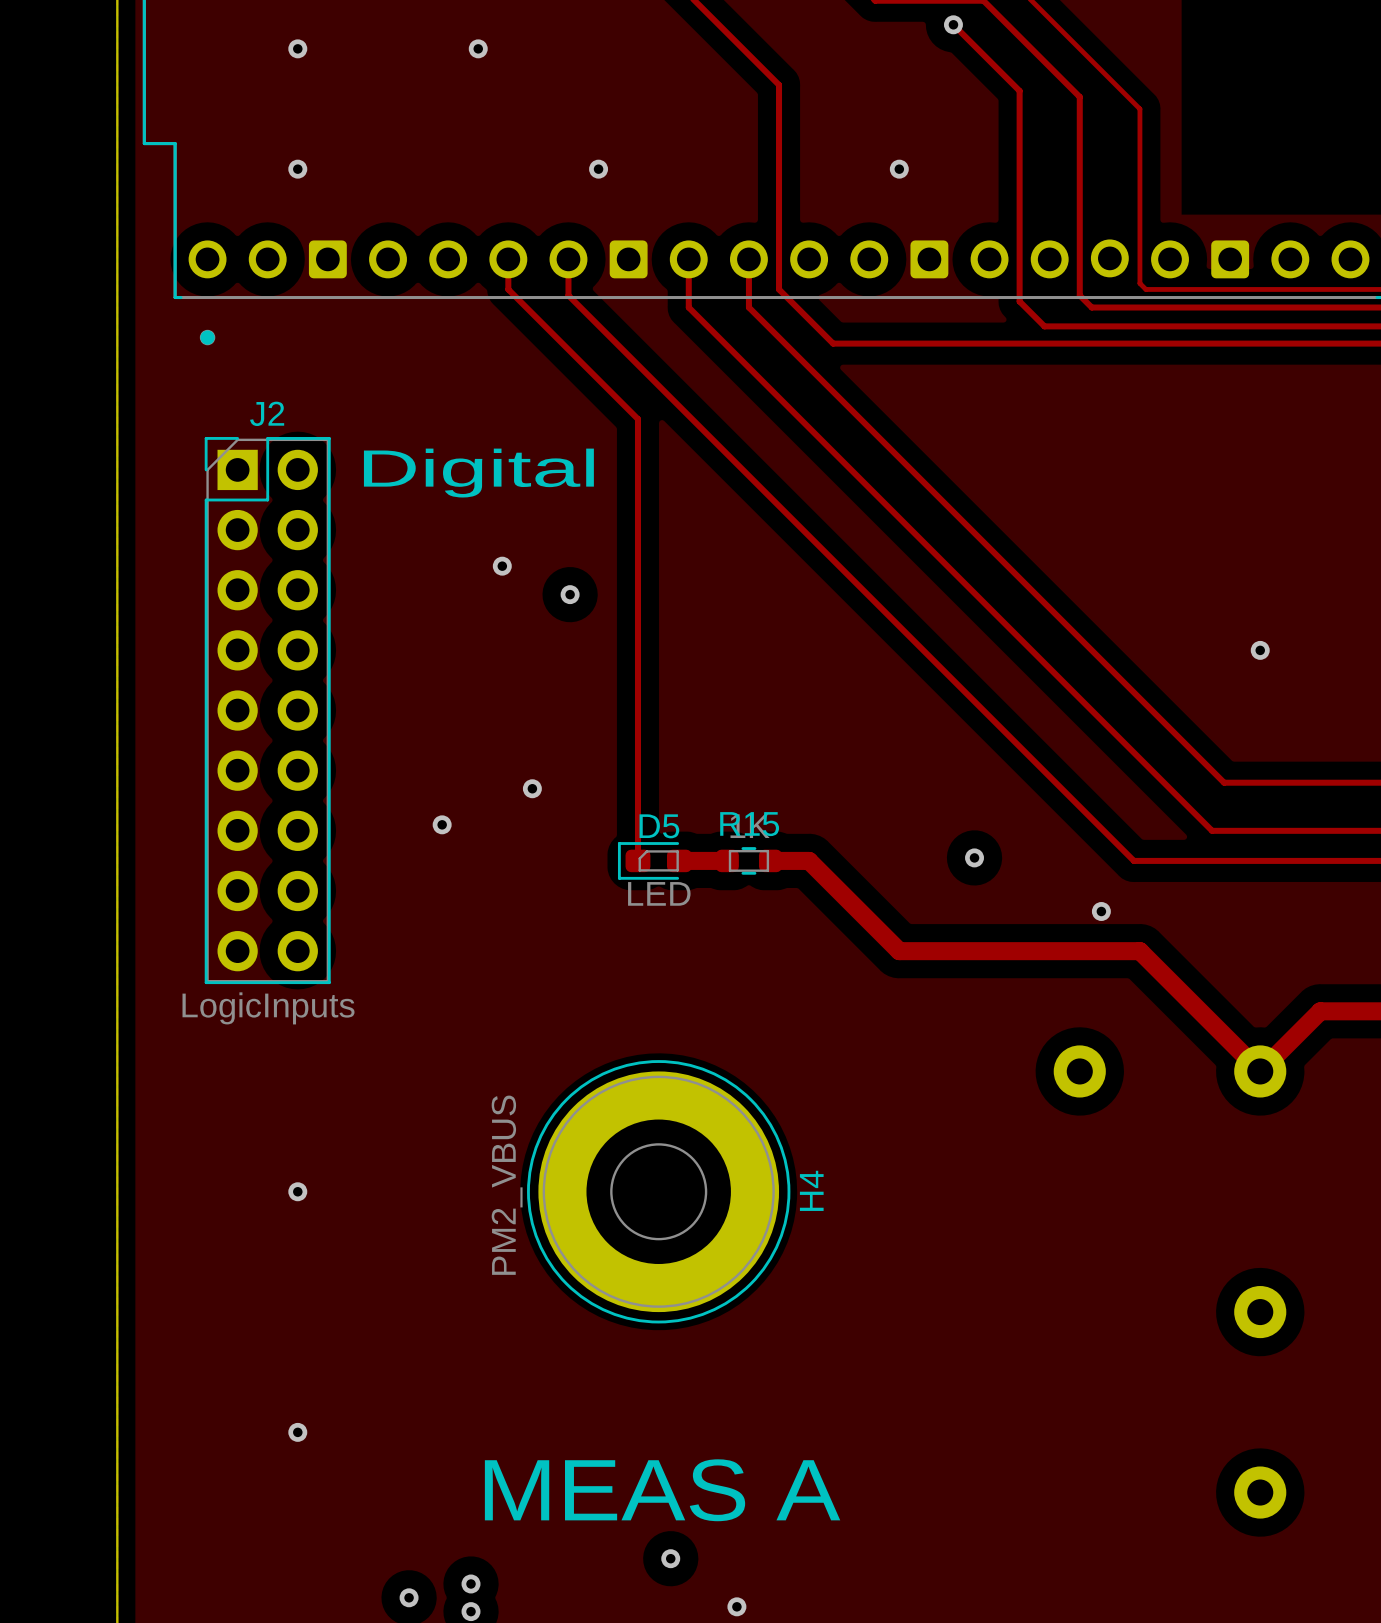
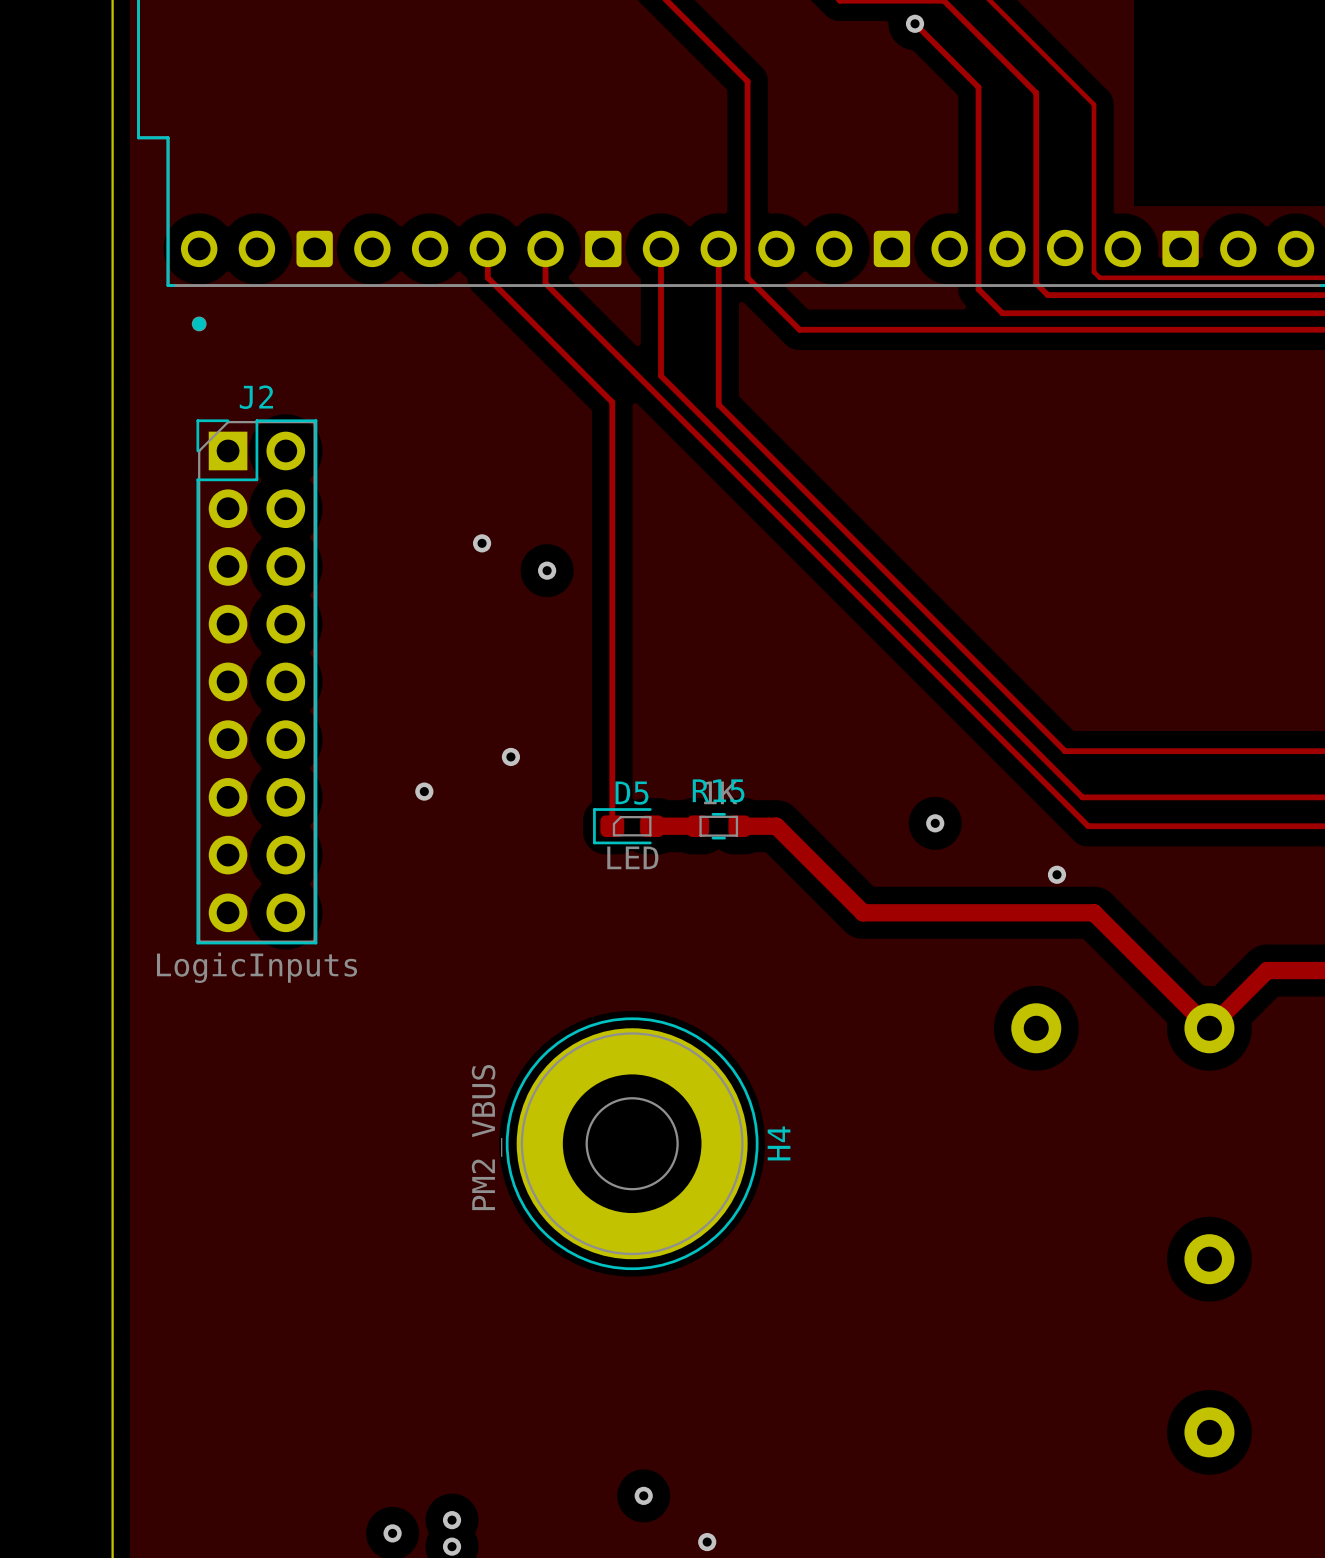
via: (297, 48) -> none
via: (478, 48) -> none
via: (297, 169) -> none
via: (598, 169) -> none
via: (899, 169) -> none
track: (688, 307) (1212, 830) -> (661, 295) (661, 375) (1082, 797) (1163, 797)
track: (748, 307) (1224, 782) -> (718, 295) (718, 404) (1065, 751) (1174, 751)
text: Digital (478, 473) -> none
via: (1260, 650) -> none
via: (297, 1191) -> none
via: (297, 1432) -> none
text: MEAS A (662, 1490) -> none

